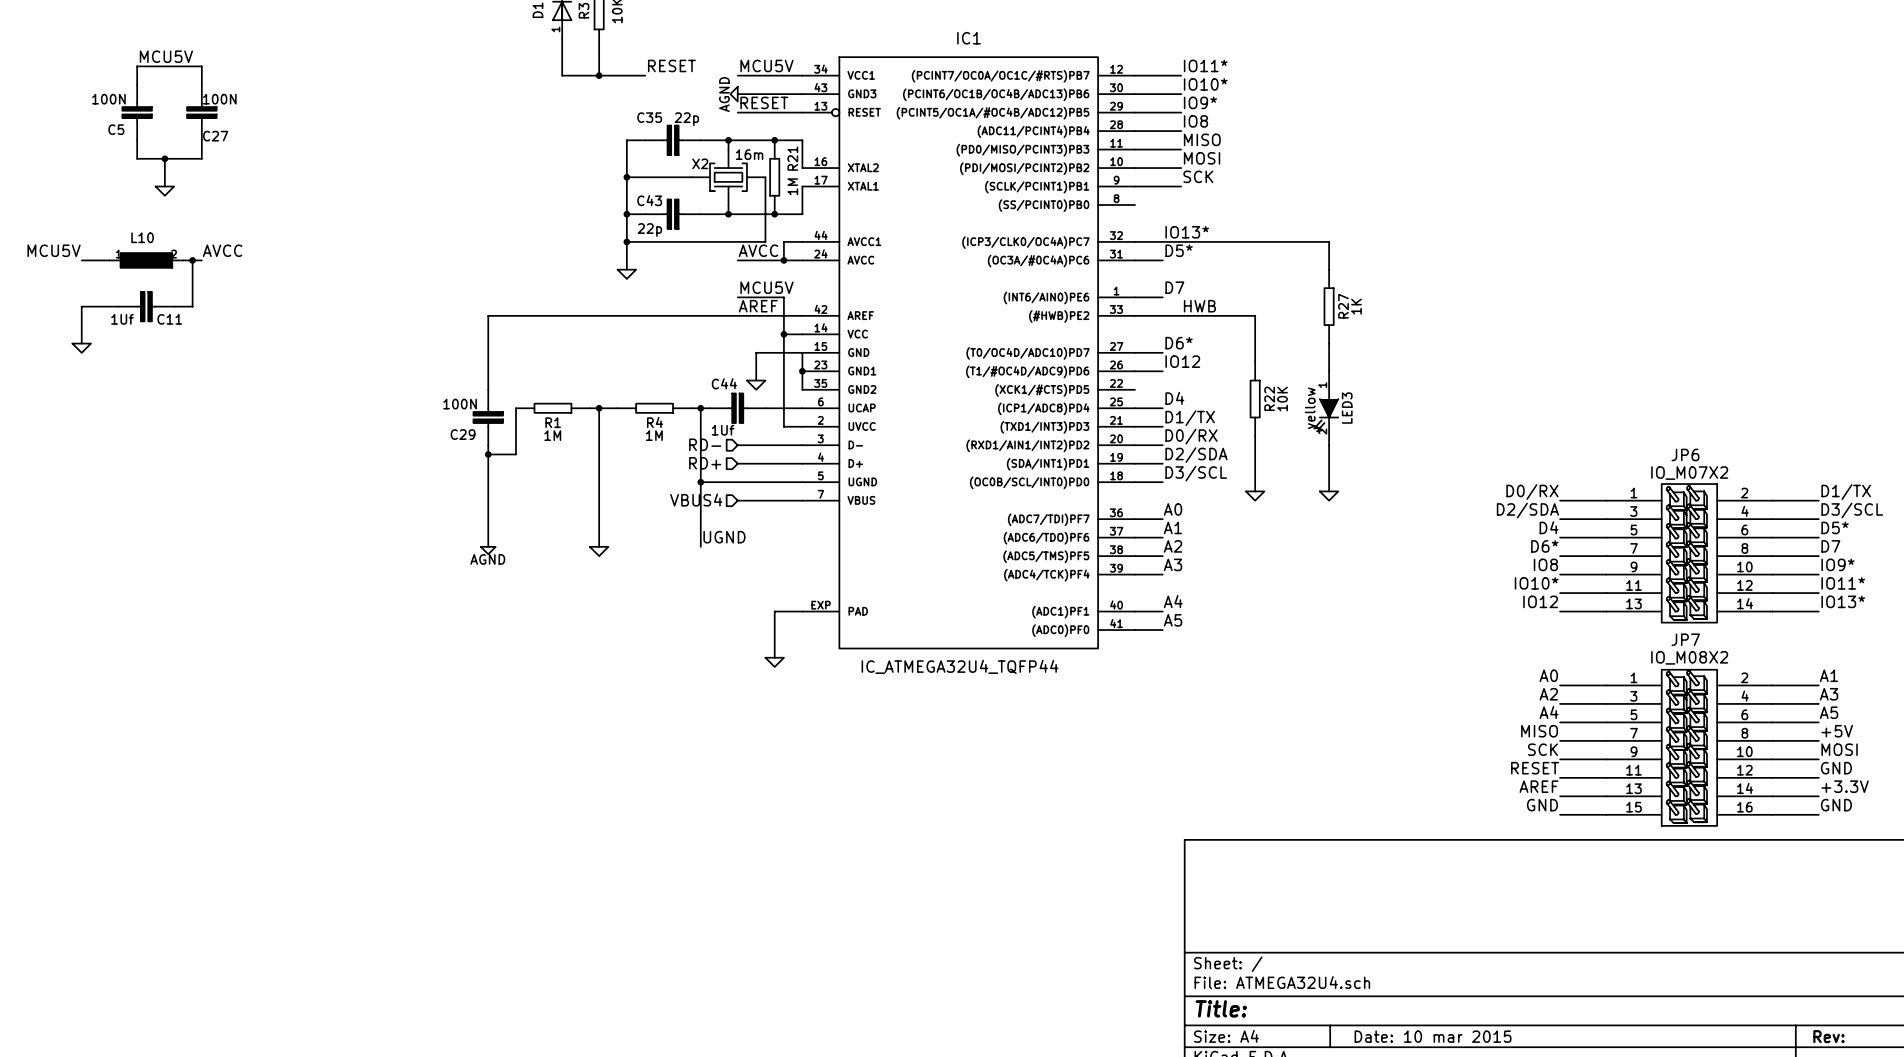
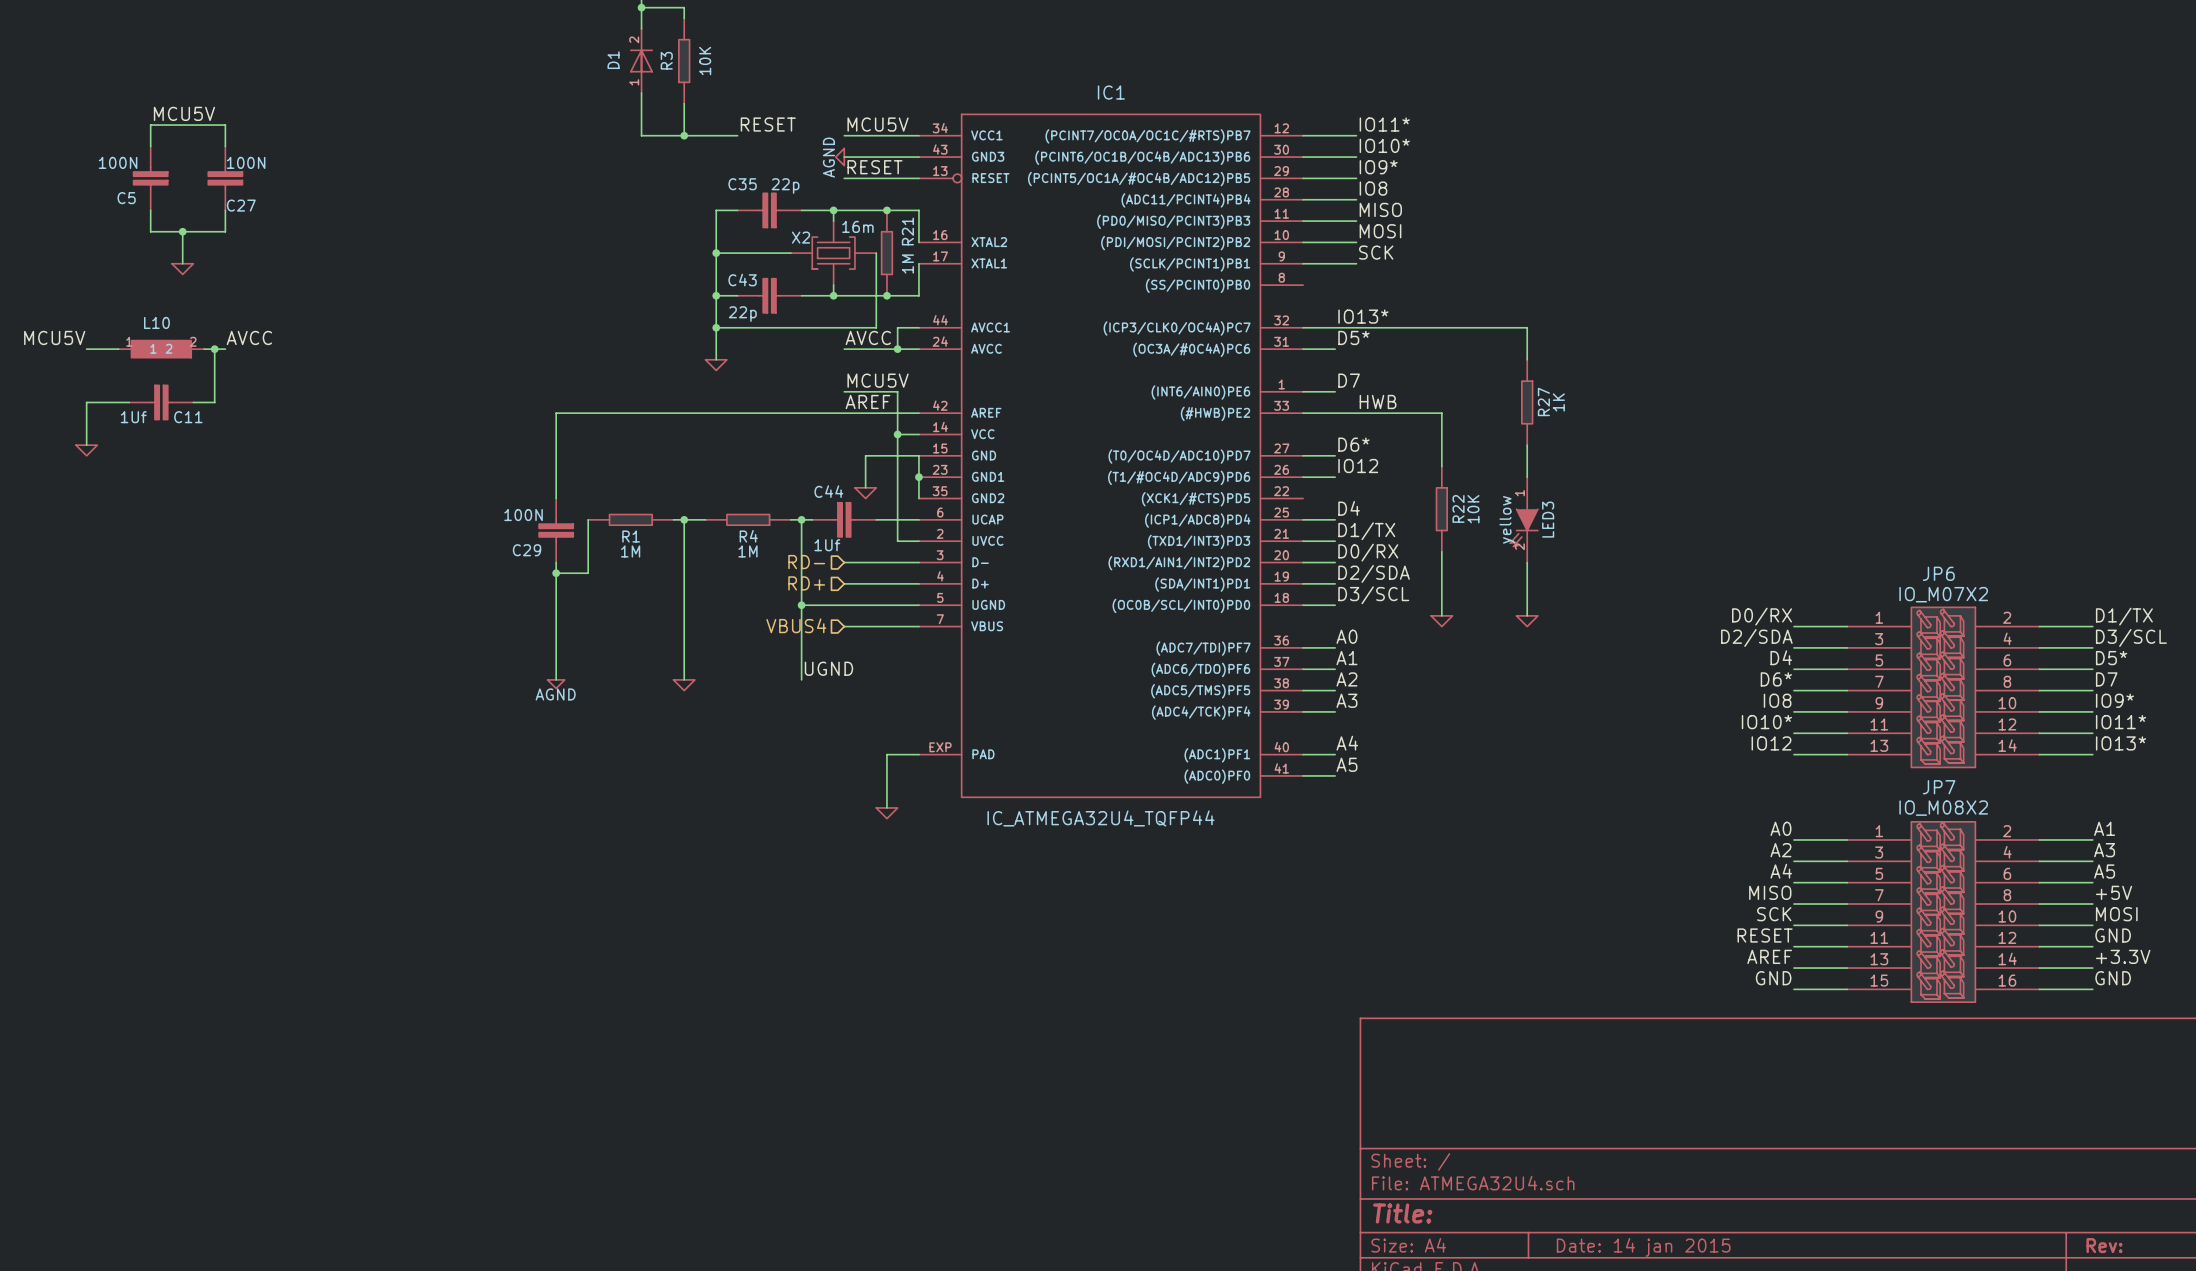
title block: Date: 10 mar 2015 (1433, 1036) -> Date: 14 jan 2015 (1643, 1247)

